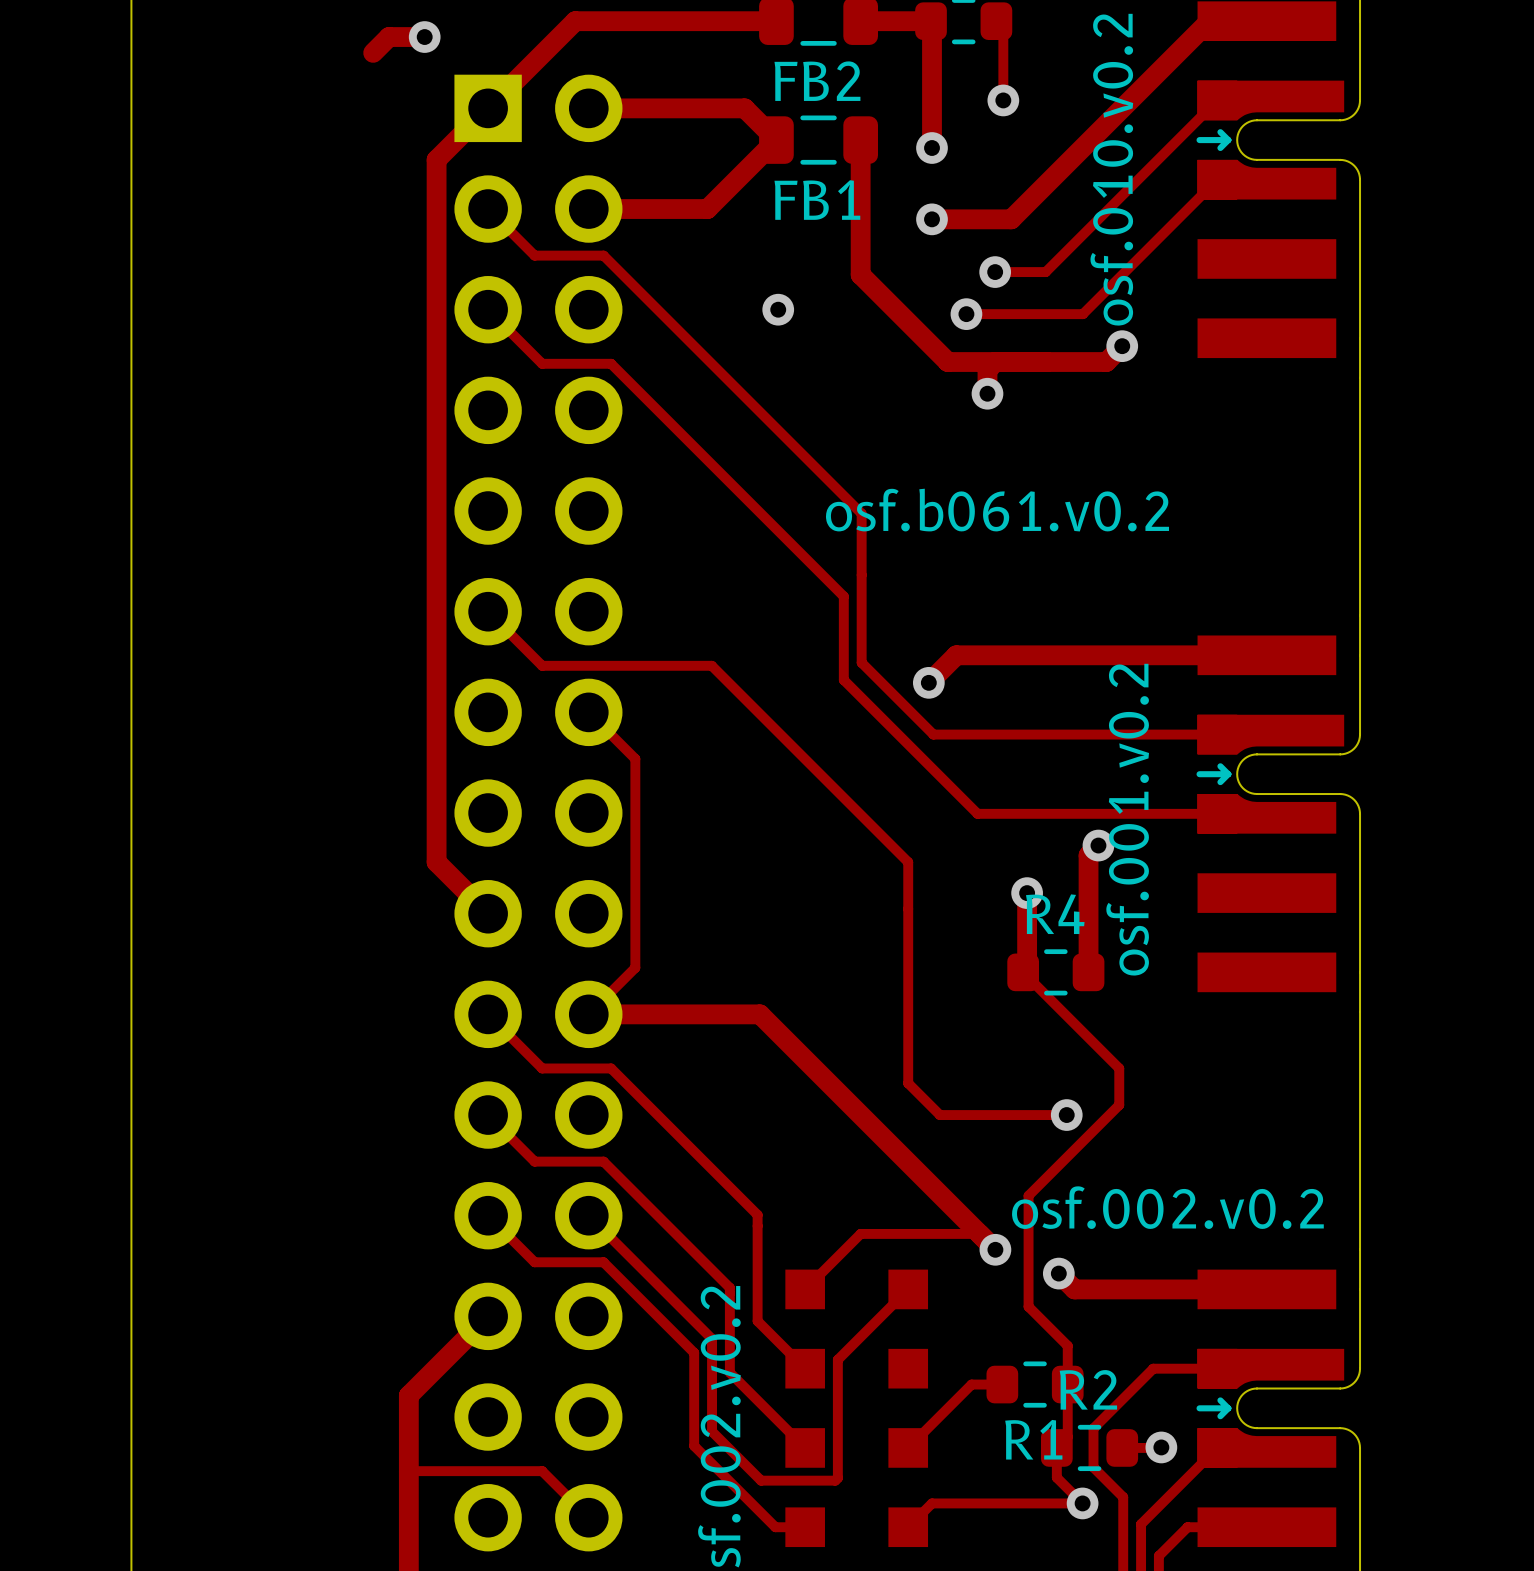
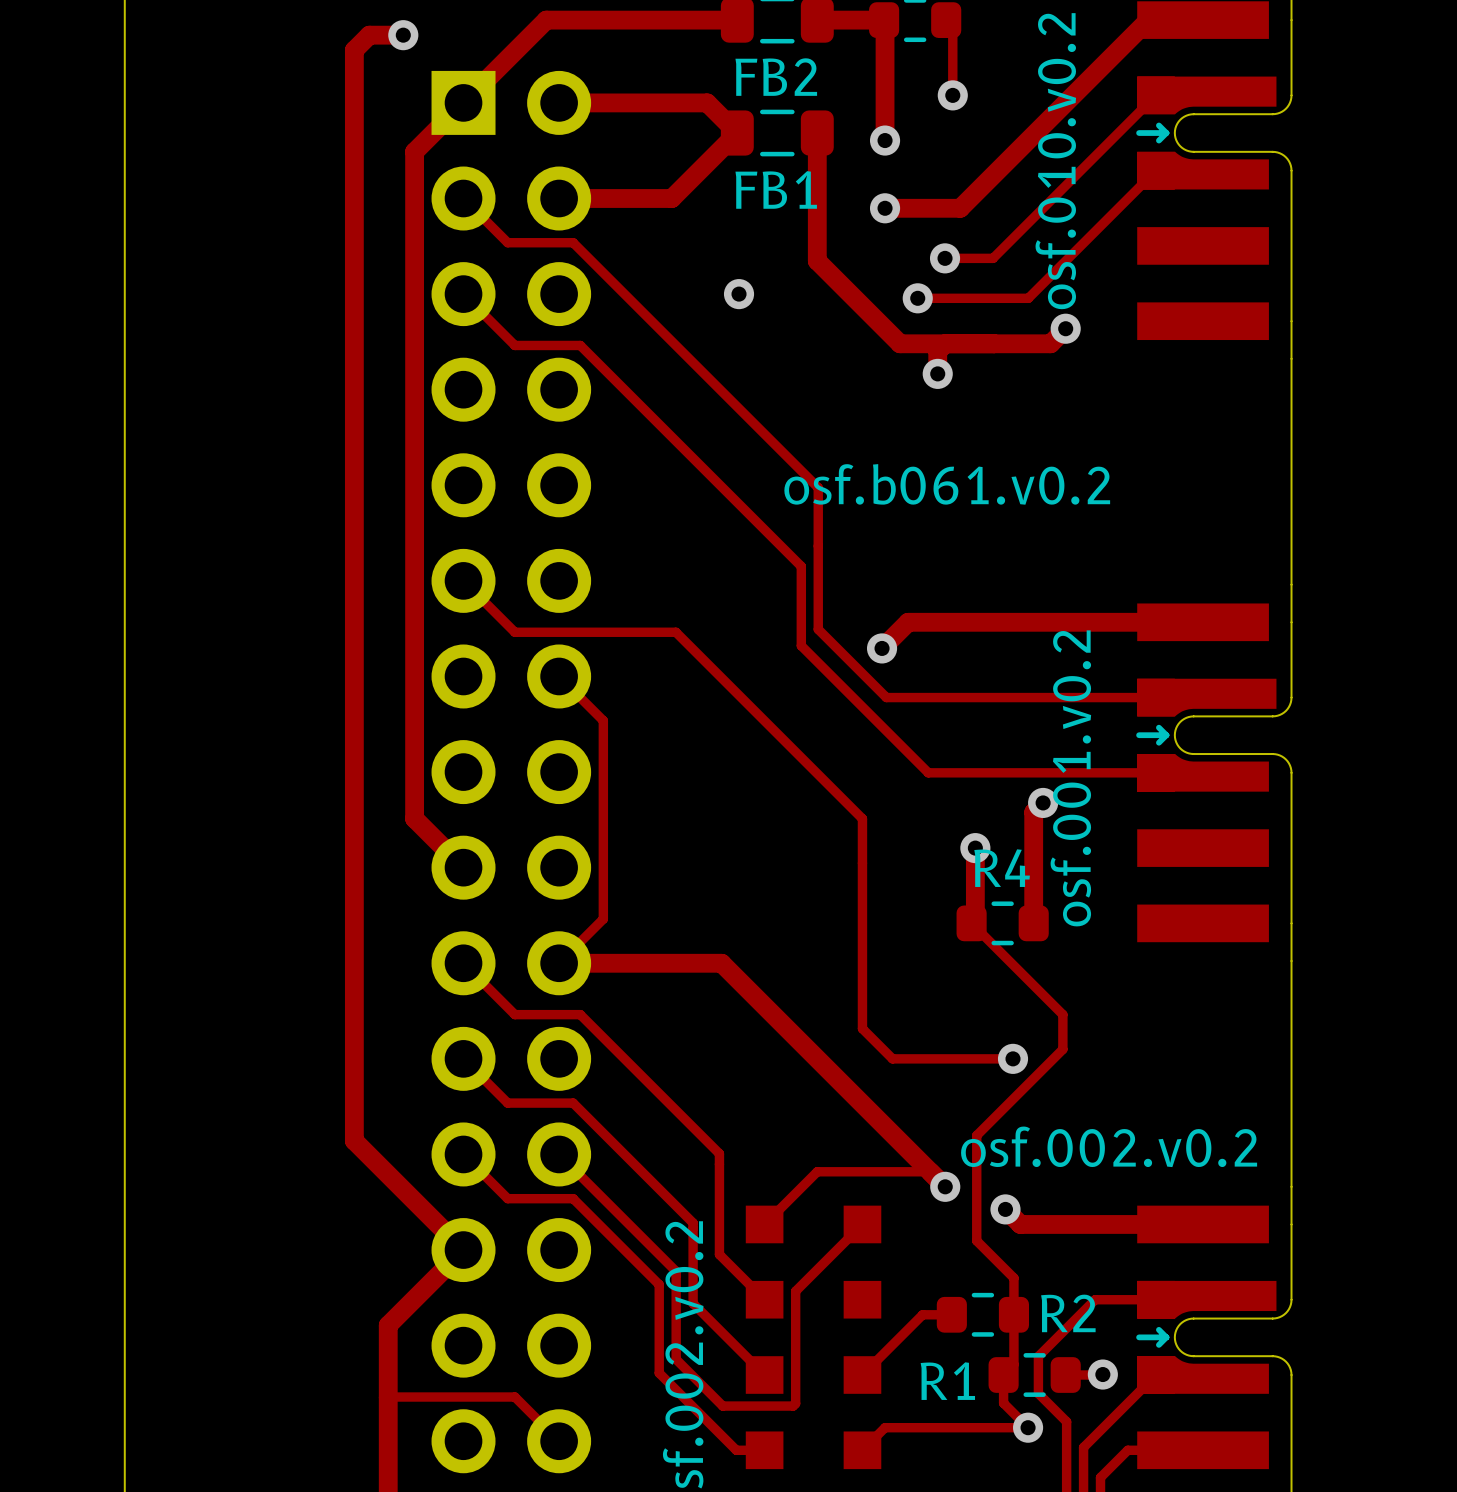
track: none -> (354, 50) (354, 1140) (463, 1250)
R2 name position: R2 (1088, 1389) -> R2 (1068, 1313)
R1 name position: R1 (1033, 1439) -> R1 (947, 1381)

